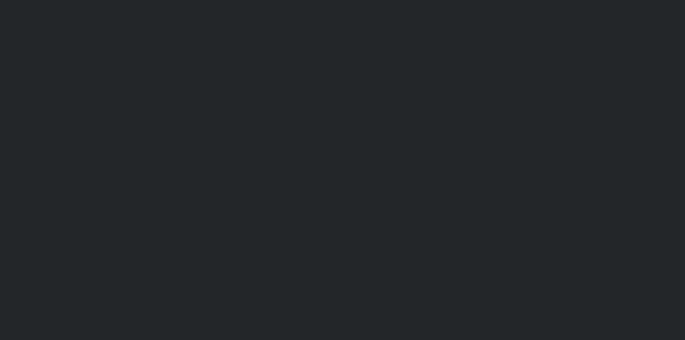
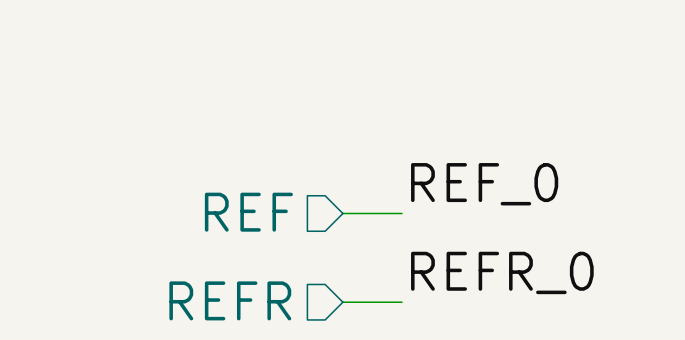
label: none -> REF_0 (484, 184)
sheet pin: none -> REF (248, 212)
wire: none -> (342, 213) (402, 213)
label: none -> REFR_0 (502, 272)
sheet pin: none -> REFR (230, 300)
wire: none -> (342, 302) (402, 302)

